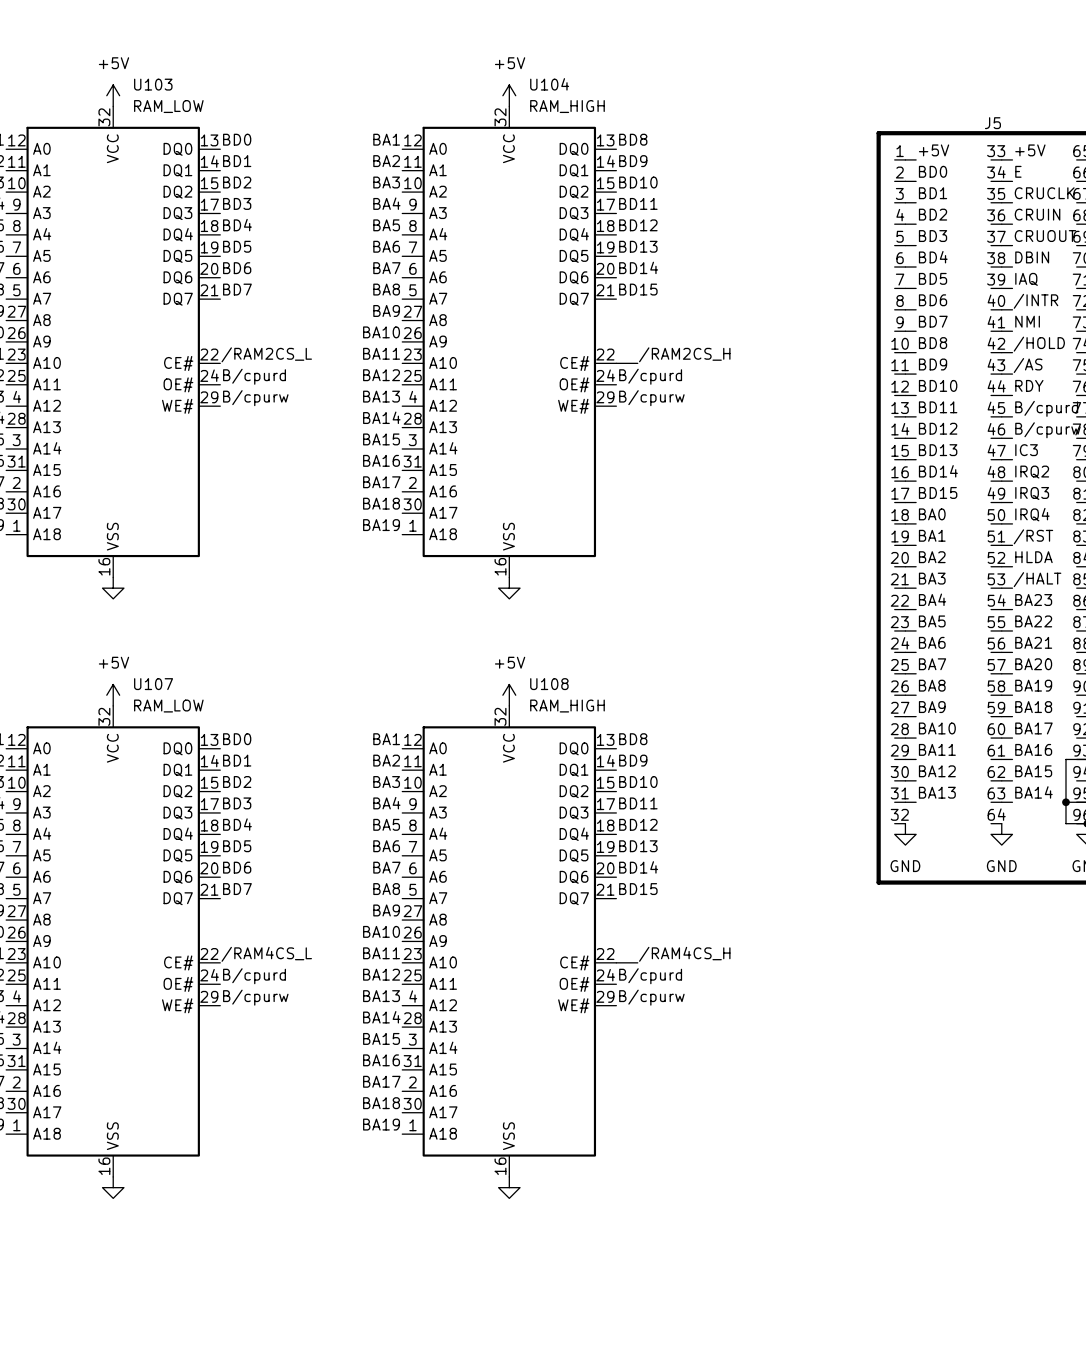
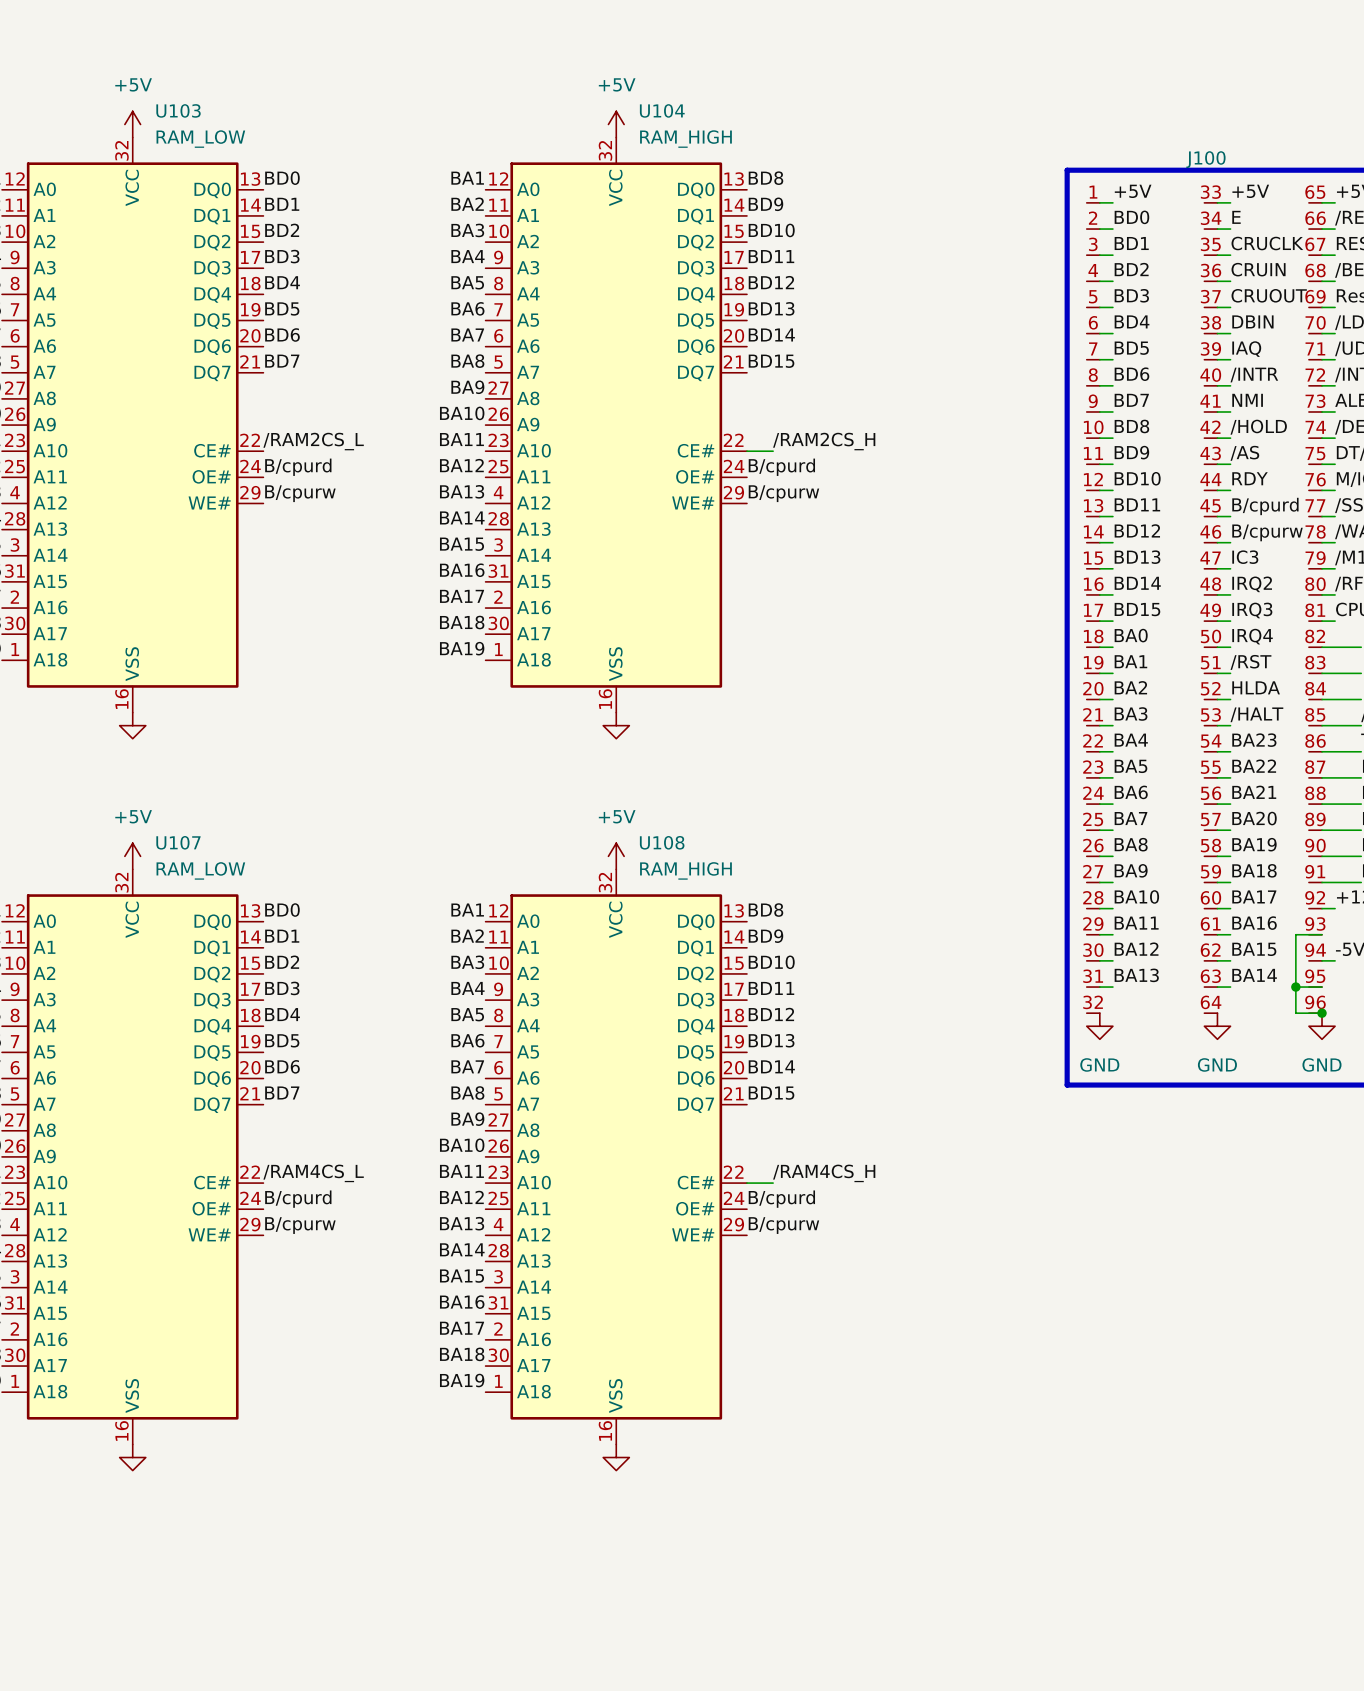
J5 name: J5 (992, 123) -> J100 (1205, 159)

